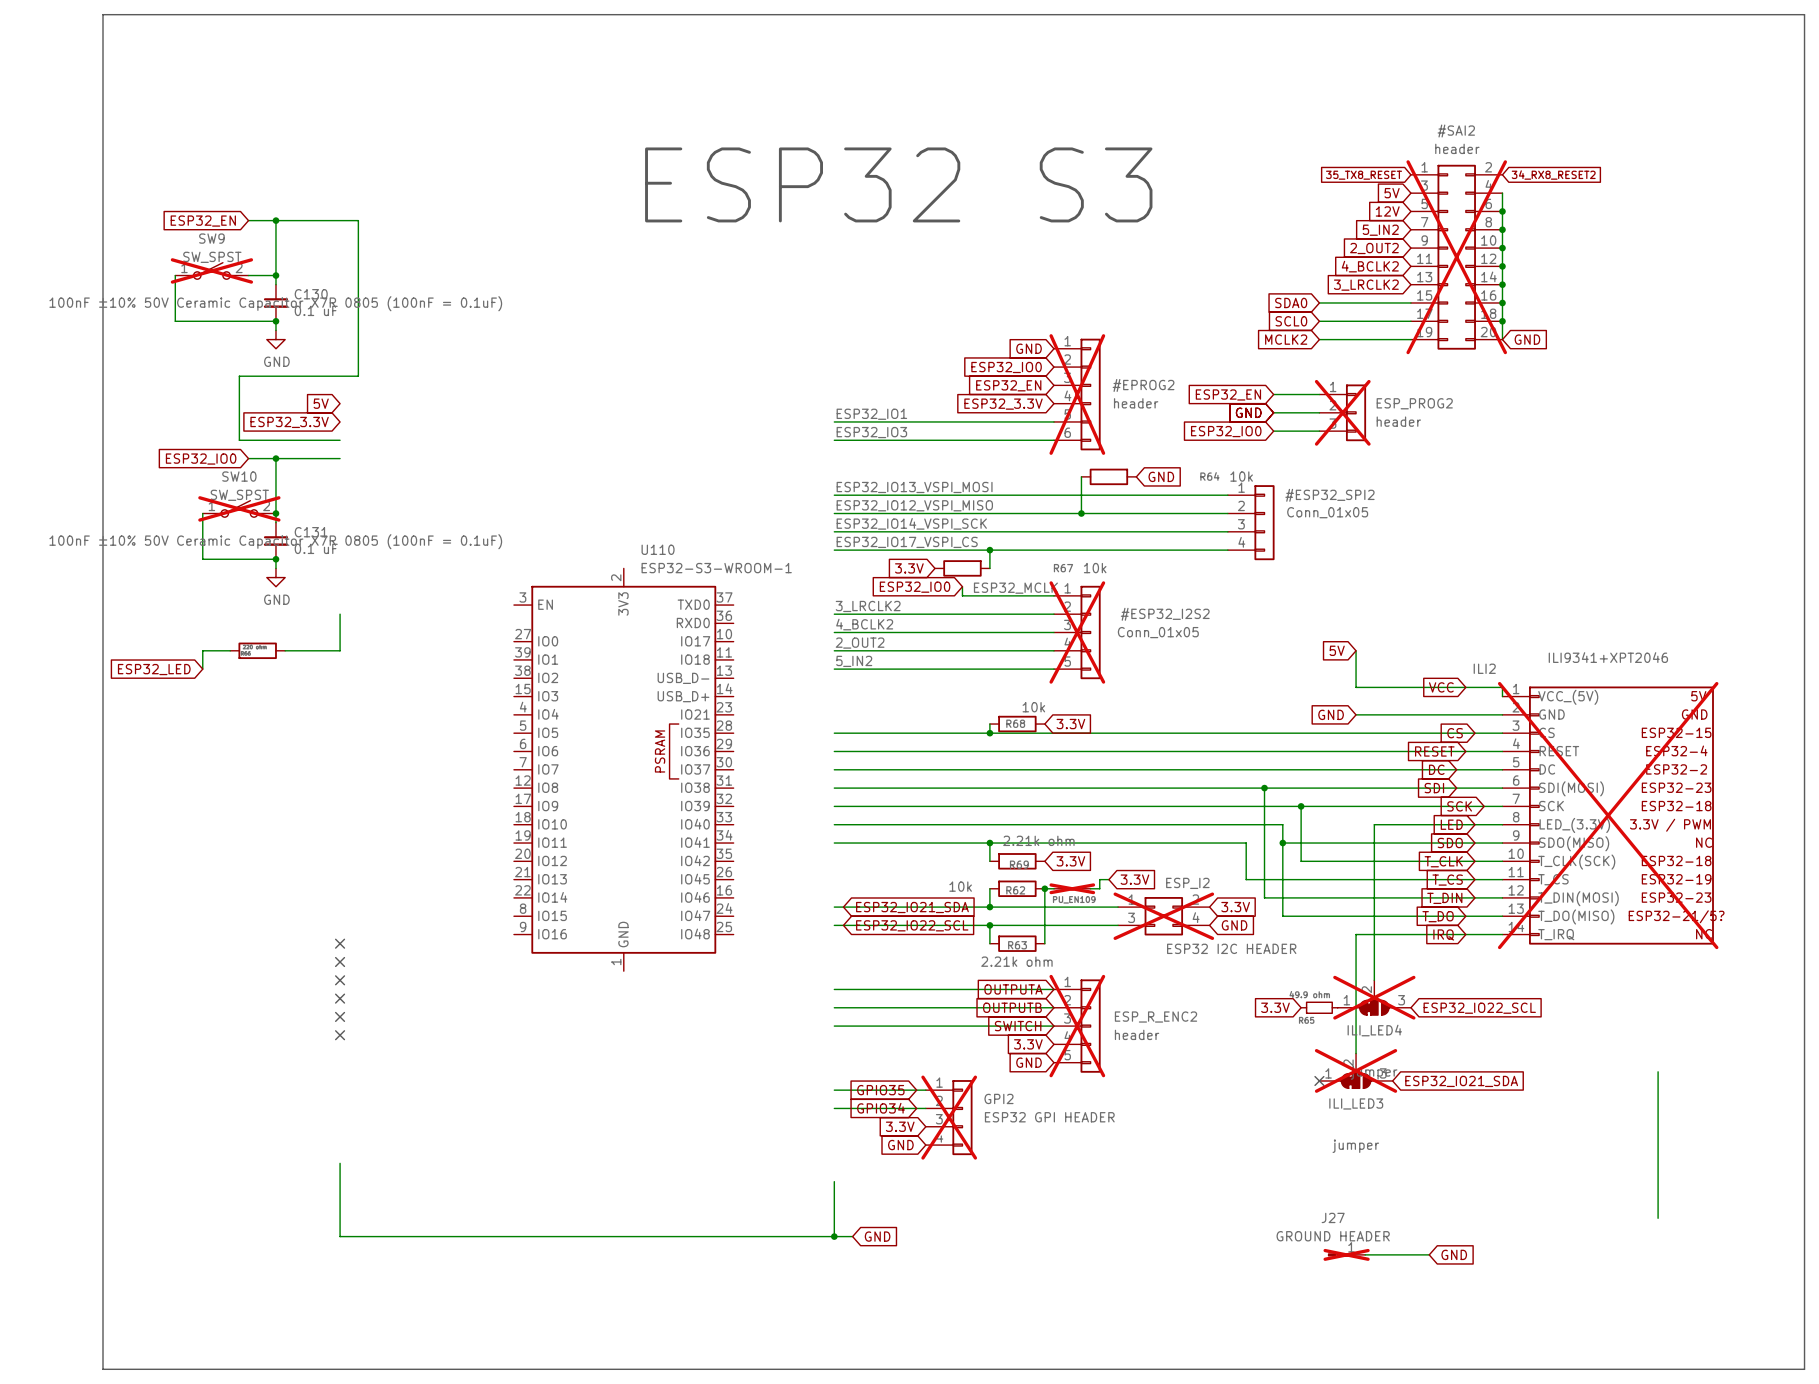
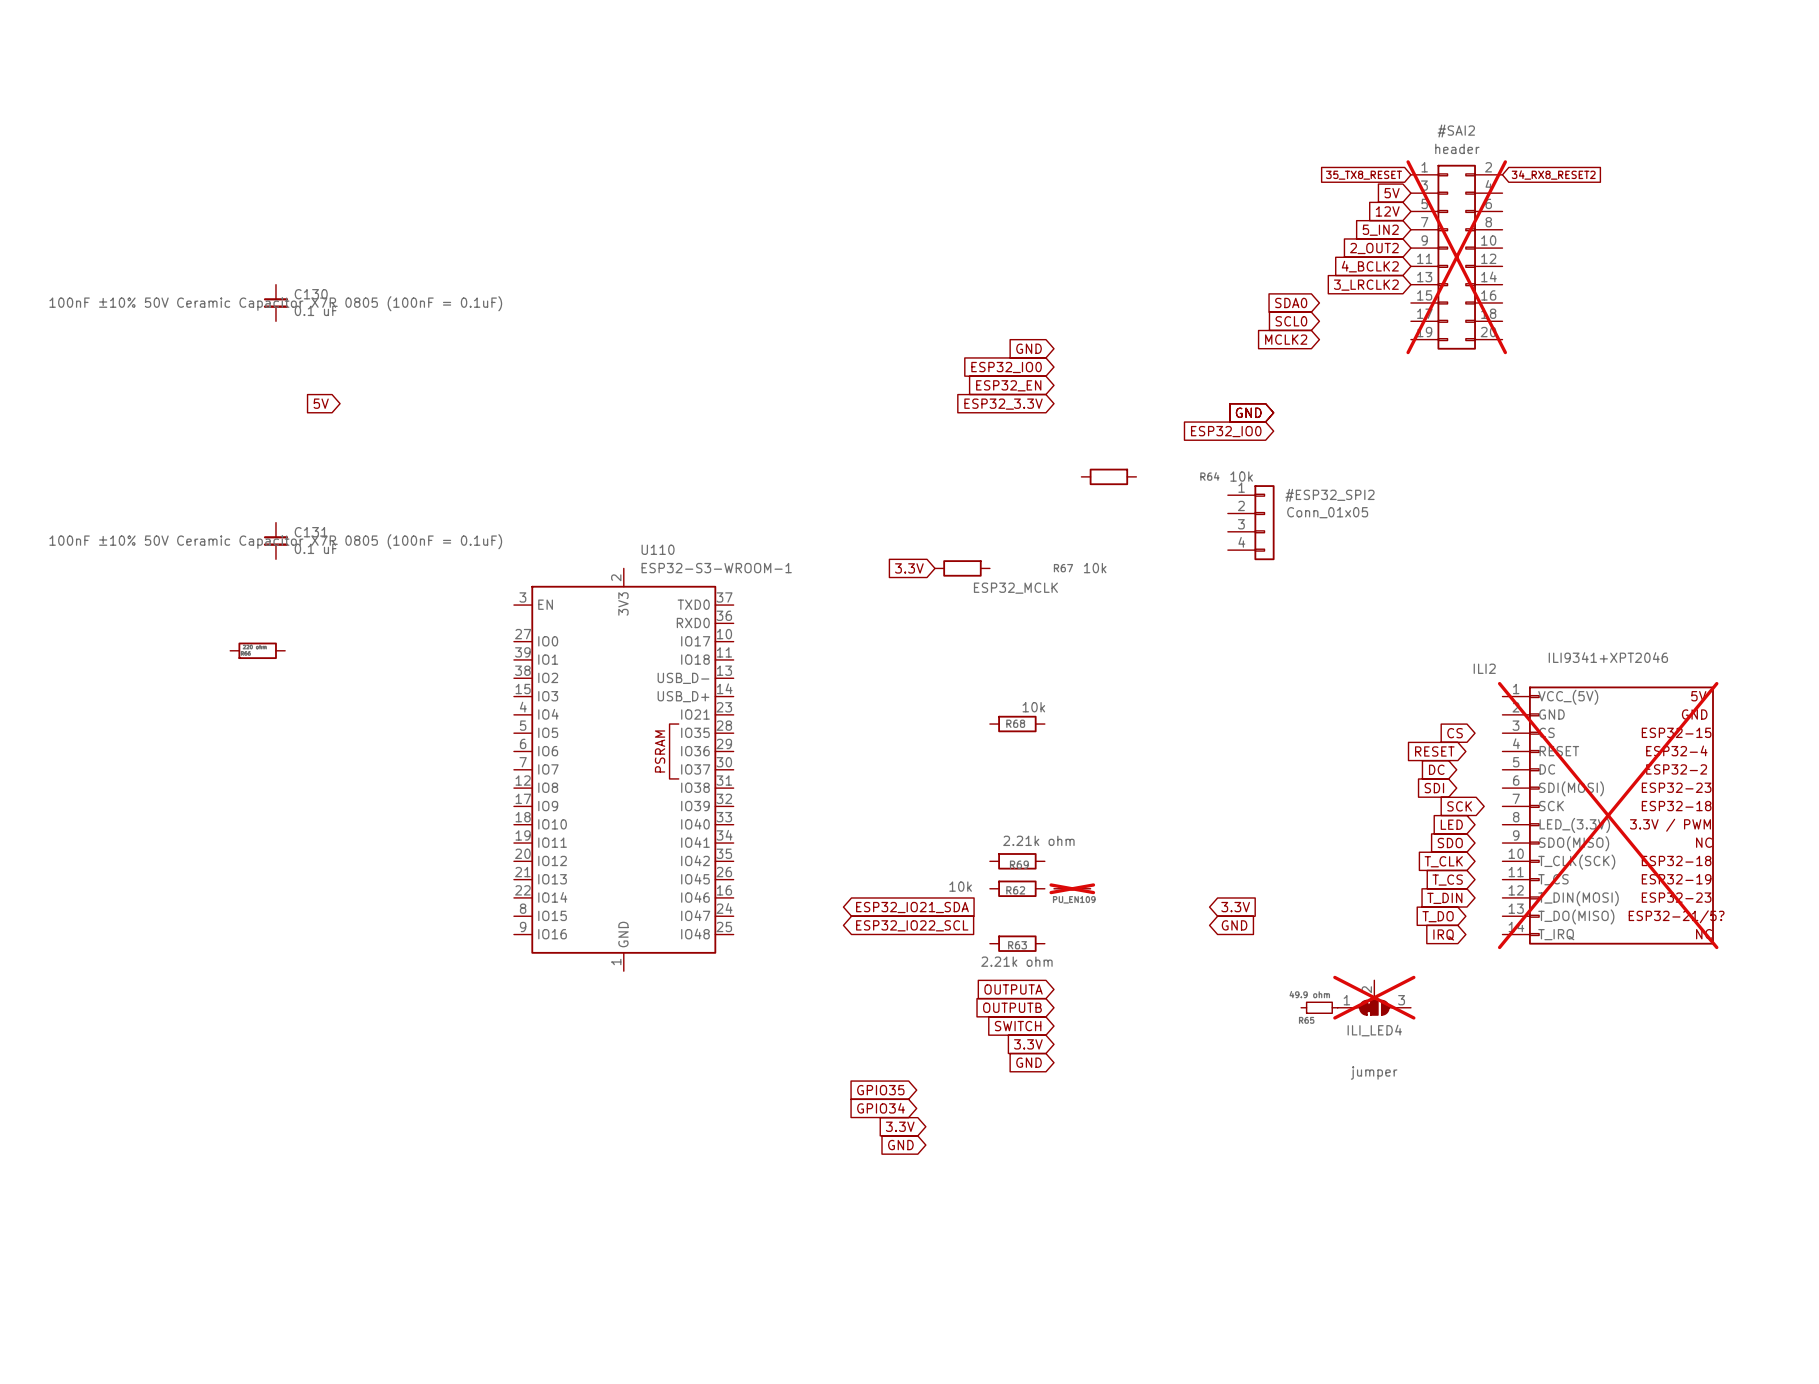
line: (103, 14) (1804, 14) (1804, 1369) (103, 1369) (103, 14) -> none
text: ESP32 S3 (898, 184) -> none
wire: (1502, 193) (1502, 339) -> none
junction: (1502, 211) -> none
wire: (248, 220) (358, 220) (358, 376) (239, 376) (239, 440) (340, 440) -> none
wire: (275, 220) (275, 284) -> none
junction: (275, 220) -> none
global label: ESP32_EN (203, 221) -> none
junction: (1502, 229) -> none
junction: (1502, 248) -> none
junction: (1502, 266) -> none
SW9: SW_SPST (211, 270) -> none
wire: (175, 275) (175, 321) (275, 321) (275, 330) -> none
wire: (248, 275) (275, 275) -> none
junction: (275, 275) -> none
junction: (1502, 284) -> none
wire: (1319, 302) (1410, 302) -> none
junction: (1502, 302) -> none
junction: (275, 321) -> none
wire: (1319, 321) (1410, 321) -> none
junction: (1502, 321) -> none
power symbol: GND (275, 339) -> none
wire: (1319, 339) (1410, 339) -> none
global label: GND (1527, 339) -> none
#EPROG2: header (1077, 394) -> none
global label: ESP32_EN (1228, 394) -> none
wire: (1273, 394) (1319, 394) -> none
wire: (1273, 412) (1319, 412) -> none
ESP_PROG2: header (1342, 412) -> none
label: ESP32_IO1 (871, 414) -> none
wire: (834, 421) (1053, 421) -> none
global label: ESP32_3.3V (289, 422) -> none
wire: (1273, 431) (1319, 431) -> none
label: ESP32_IO3 (871, 432) -> none
wire: (834, 440) (1053, 440) -> none
wire: (248, 458) (340, 458) -> none
wire: (275, 458) (275, 522) -> none
junction: (275, 458) -> none
global label: ESP32_IO0 (201, 459) -> none
wire: (1081, 476) (1081, 513) -> none
global label: GND (1161, 476) -> none
label: ESP32_IO13_VSPI_MOSI (914, 487) -> none
wire: (834, 495) (1227, 495) -> none
label: ESP32_IO12_VSPI_MISO (914, 505) -> none
SW10: SW_SPST (239, 508) -> none
wire: (202, 513) (202, 559) (275, 559) (275, 568) -> none
junction: (275, 513) -> none
wire: (834, 513) (1227, 513) -> none
junction: (1081, 513) -> none
label: ESP32_IO14_VSPI_SCK (911, 523) -> none
wire: (834, 531) (1227, 531) -> none
label: ESP32_IO17_VSPI_CS (907, 542) -> none
wire: (834, 550) (1227, 550) -> none
wire: (989, 550) (989, 568) -> none
junction: (989, 550) -> none
junction: (275, 559) -> none
power symbol: GND (275, 577) -> none
wire: (962, 586) (962, 595) (1053, 595) -> none
global label: ESP32_IO0 (915, 587) -> none
label: 3_LRCLK2 (868, 606) -> none
wire: (340, 614) (340, 650) (285, 650) -> none
wire: (834, 614) (1053, 614) -> none
label: 4_BCLK2 (864, 624) -> none
wire: (834, 632) (1053, 632) -> none
#ESP32_I2S2: Conn_01x05 (1077, 632) -> none
label: 2_OUT2 (860, 643) -> none
wire: (230, 650) (202, 650) (202, 669) -> none
wire: (834, 650) (1053, 650) -> none
global label: 5V (1337, 650) -> none
wire: (1356, 650) (1356, 687) (1502, 687) (1502, 696) -> none
label: 5_IN2 (854, 661) -> none
global label: ESP32_LED (154, 669) -> none
wire: (834, 669) (1053, 669) -> none
global label: VCC (1441, 687) -> none
global label: GND (1331, 714) -> none
wire: (1356, 714) (1502, 714) -> none
wire: (989, 724) (989, 733) -> none
global label: 3.3V (1070, 724) -> none
wire: (834, 733) (1502, 733) -> none
junction: (989, 733) -> none
wire: (834, 751) (1502, 751) -> none
wire: (834, 769) (1502, 769) -> none
wire: (834, 788) (1502, 788) -> none
wire: (1264, 788) (1264, 897) (1502, 897) -> none
junction: (1264, 788) -> none
wire: (834, 806) (1502, 806) -> none
wire: (1301, 806) (1301, 861) (1502, 861) -> none
junction: (1301, 806) -> none
wire: (834, 824) (1282, 824) (1282, 916) (1502, 916) -> none
wire: (1502, 824) (1374, 824) (1374, 980) -> none
wire: (834, 843) (1246, 843) (1246, 879) (1502, 879) -> none
wire: (989, 843) (989, 861) -> none
junction: (989, 843) -> none
wire: (1282, 843) (1502, 843) -> none
junction: (1282, 843) -> none
global label: 3.3V (1070, 861) -> none
wire: (1108, 879) (1099, 879) (1099, 888) (1090, 888) -> none
global label: 3.3V (1134, 879) -> none
wire: (989, 888) (989, 907) -> none
junction: (1044, 888) -> none
wire: (1053, 888) (1044, 888) (1044, 943) -> none
wire: (834, 907) (1118, 907) -> none
junction: (989, 907) -> none
ESP_I2: ESP32 I2C HEADER (1163, 916) -> none
wire: (834, 925) (1118, 925) -> none
wire: (989, 925) (989, 943) -> none
junction: (989, 925) -> none
wire: (1502, 934) (1356, 934) (1356, 1053) -> none
no-connect mark: (340, 943) -> none
no-connect mark: (340, 962) -> none
no-connect mark: (340, 980) -> none
wire: (834, 989) (1053, 989) -> none
no-connect mark: (340, 998) -> none
wire: (834, 1007) (1053, 1007) -> none
global label: 3.3V (1275, 1007) -> none
global label: ESP32_IO22_SCL (1479, 1008) -> none
no-connect mark: (340, 1016) -> none
wire: (834, 1026) (1053, 1026) -> none
ESP_R_ENC2: header (1077, 1026) -> none
no-connect mark: (340, 1035) -> none
ILI_LED3: jumper (1356, 1070) -> none
wire: (1658, 1071) (1658, 1218) -> none
no-connect mark: (1319, 1080) -> none
global label: ESP32_IO21_SDA (1461, 1081) -> none
wire: (834, 1090) (925, 1090) -> none
wire: (834, 1108) (925, 1108) -> none
GPI2: ESP32 GPI HEADER (949, 1117) -> none
wire: (340, 1163) (340, 1236) (852, 1236) -> none
wire: (834, 1181) (834, 1236) -> none
junction: (834, 1236) -> none
global label: GND (877, 1236) -> none
J27: GROUND HEADER (1346, 1254) -> none
wire: (1365, 1254) (1429, 1254) -> none
global label: GND (1454, 1254) -> none

